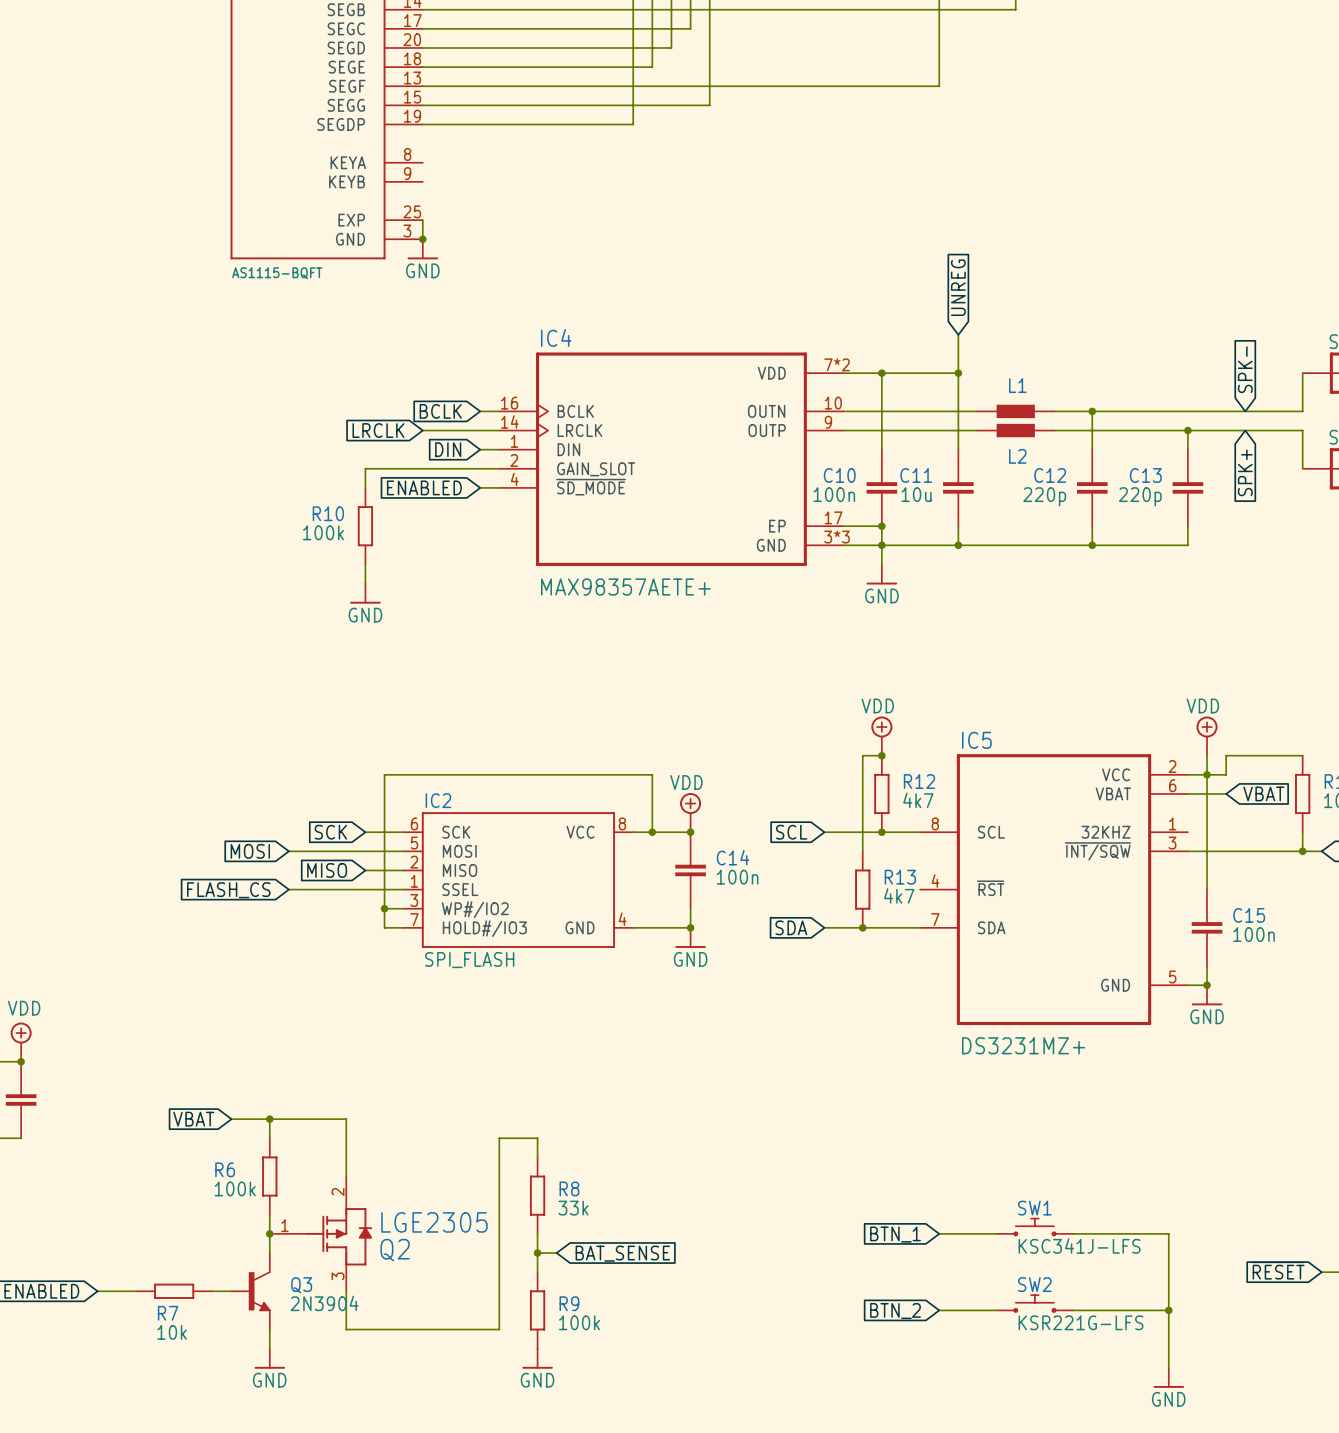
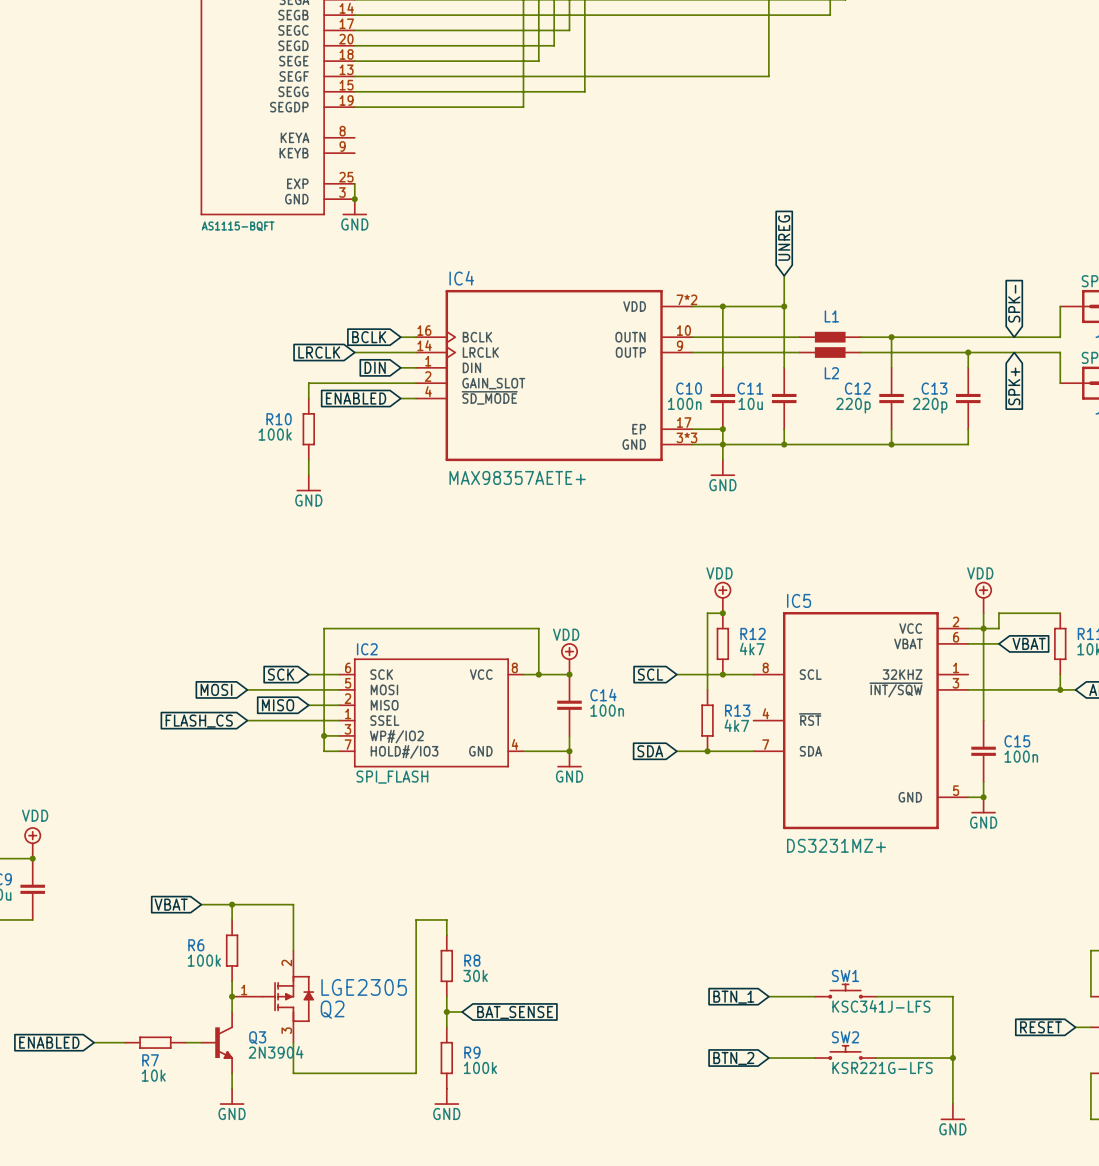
R8 value: 33k (573, 1208) -> 30k (475, 975)

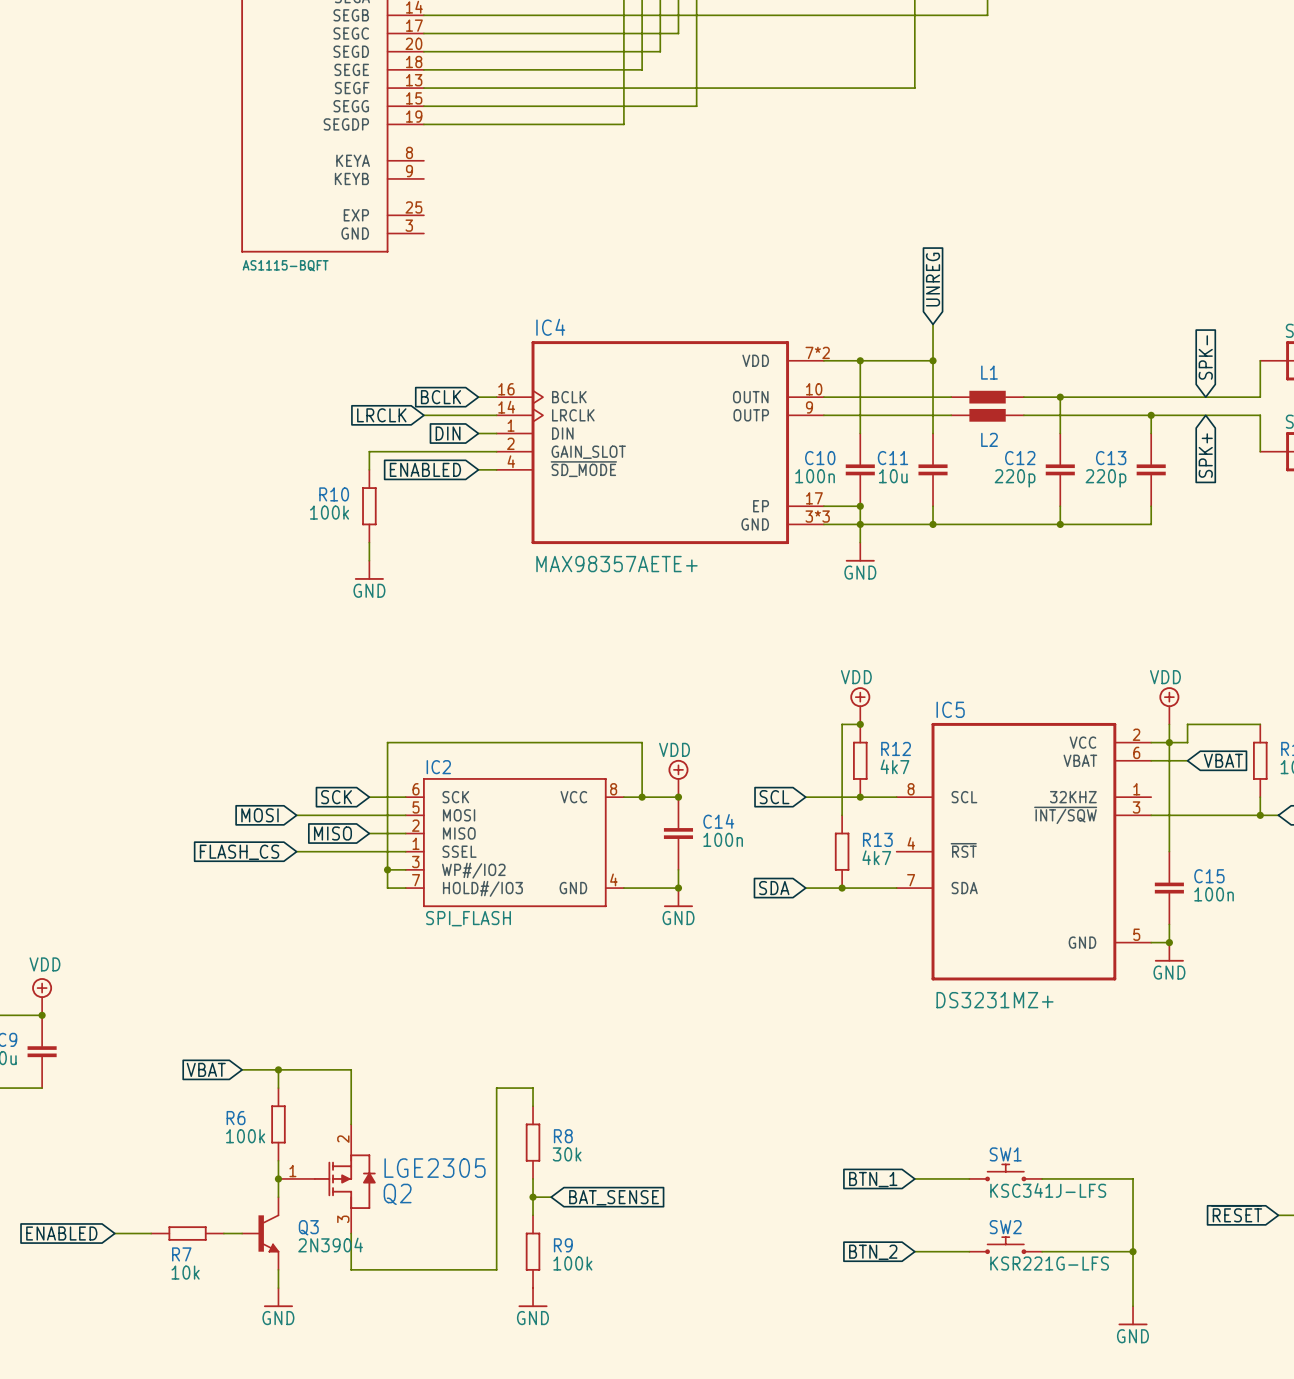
wire: (354, 183) (354, 199) -> none
junction: (354, 199) -> none
power symbol: GND (354, 207) -> none

